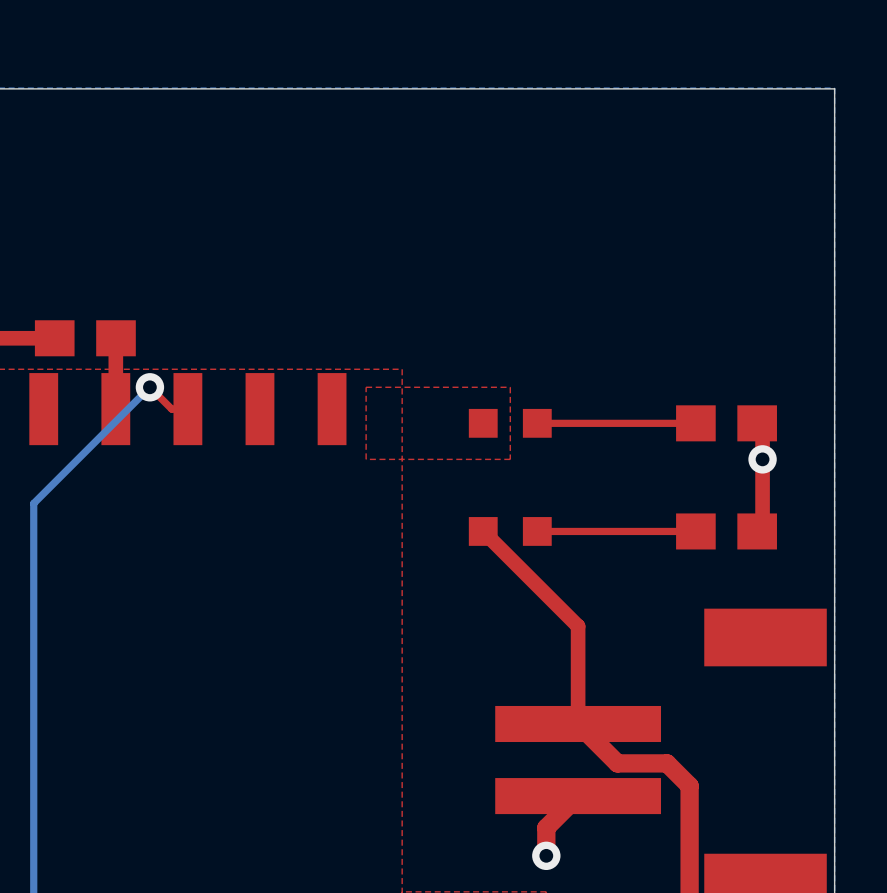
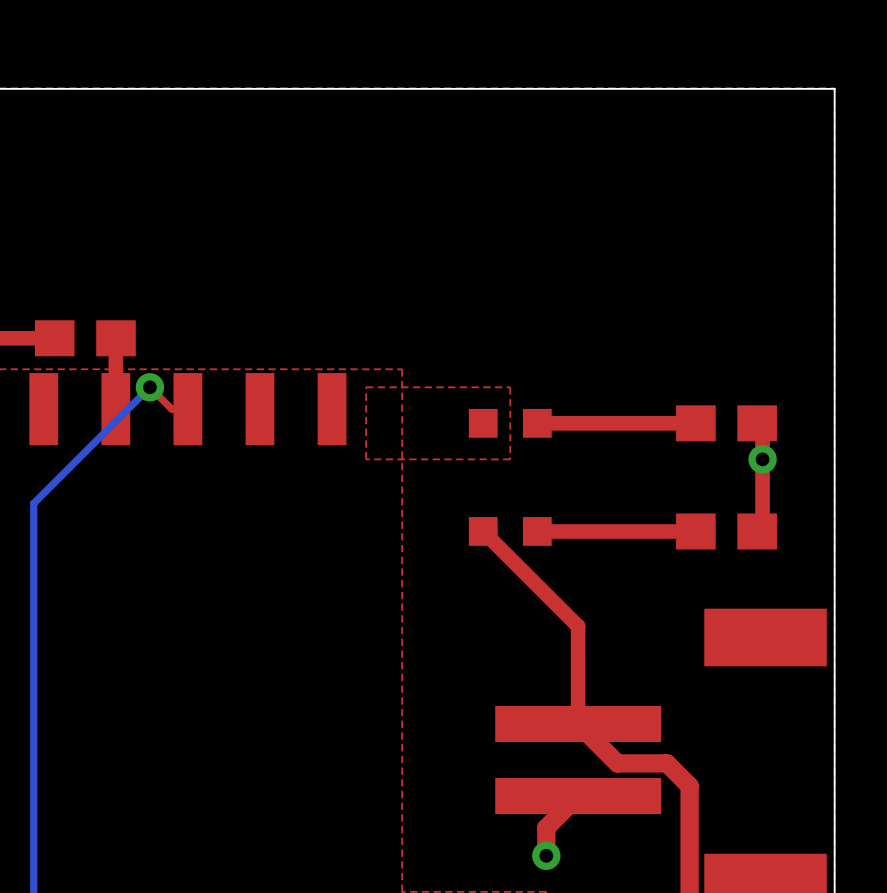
top track width: thin (695, 423) (537, 423) -> thick (695, 423) (537, 423)
top track width: thin (695, 531) (537, 531) -> thick (695, 531) (537, 531)

